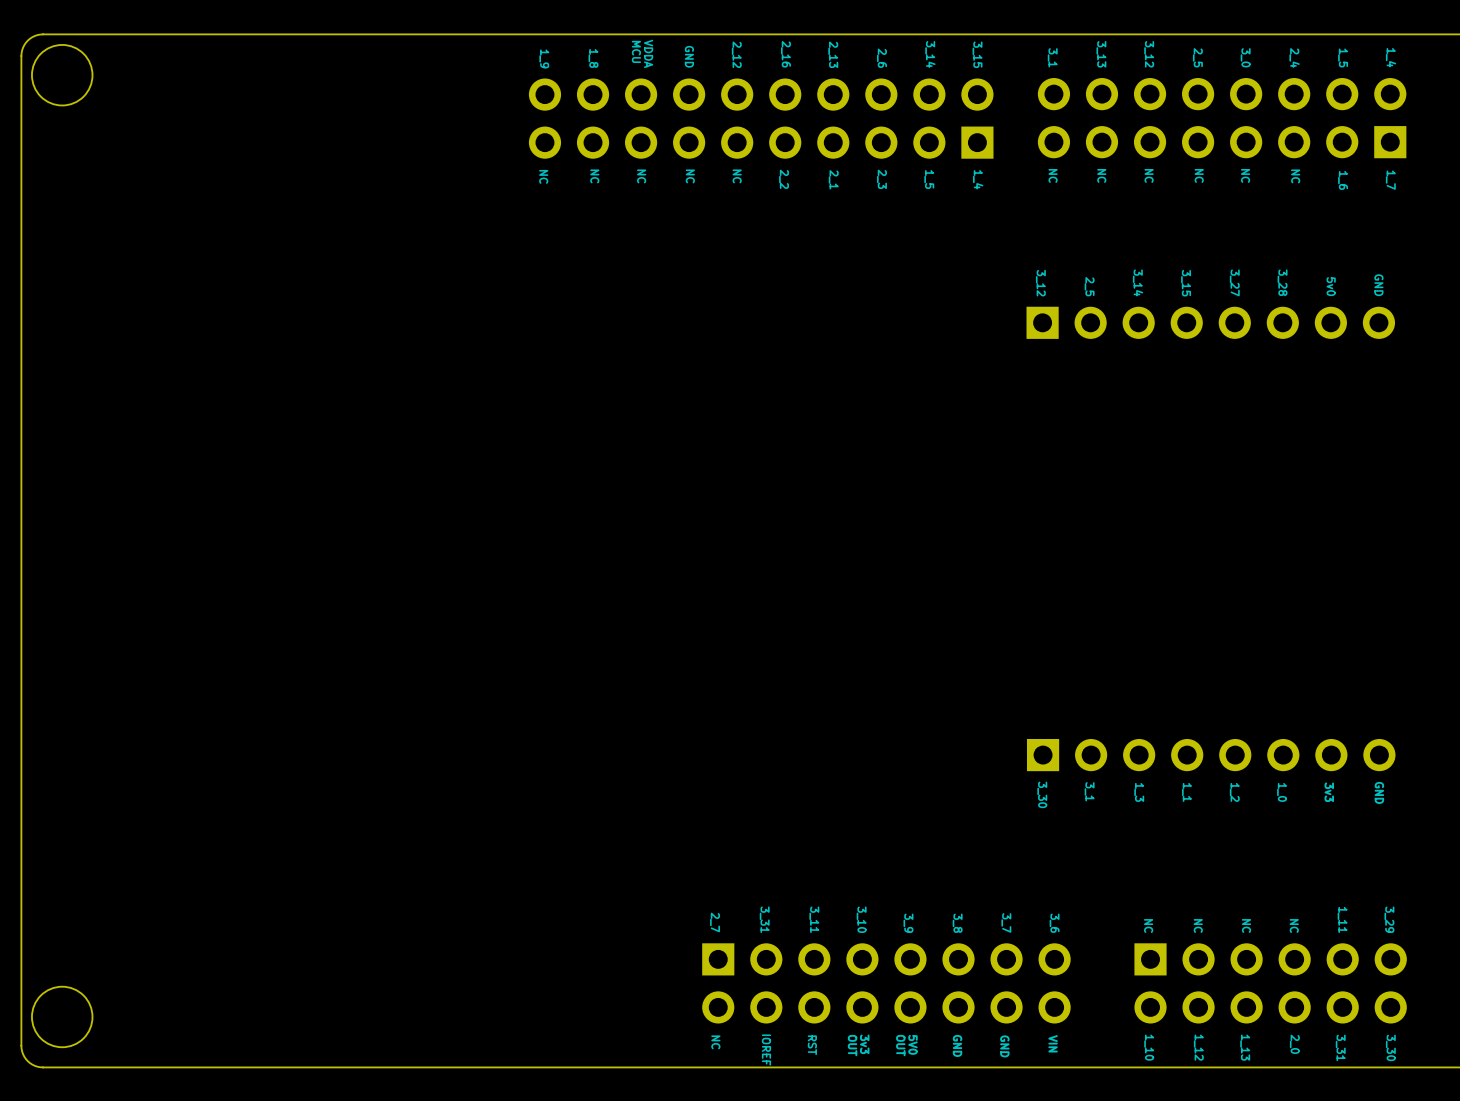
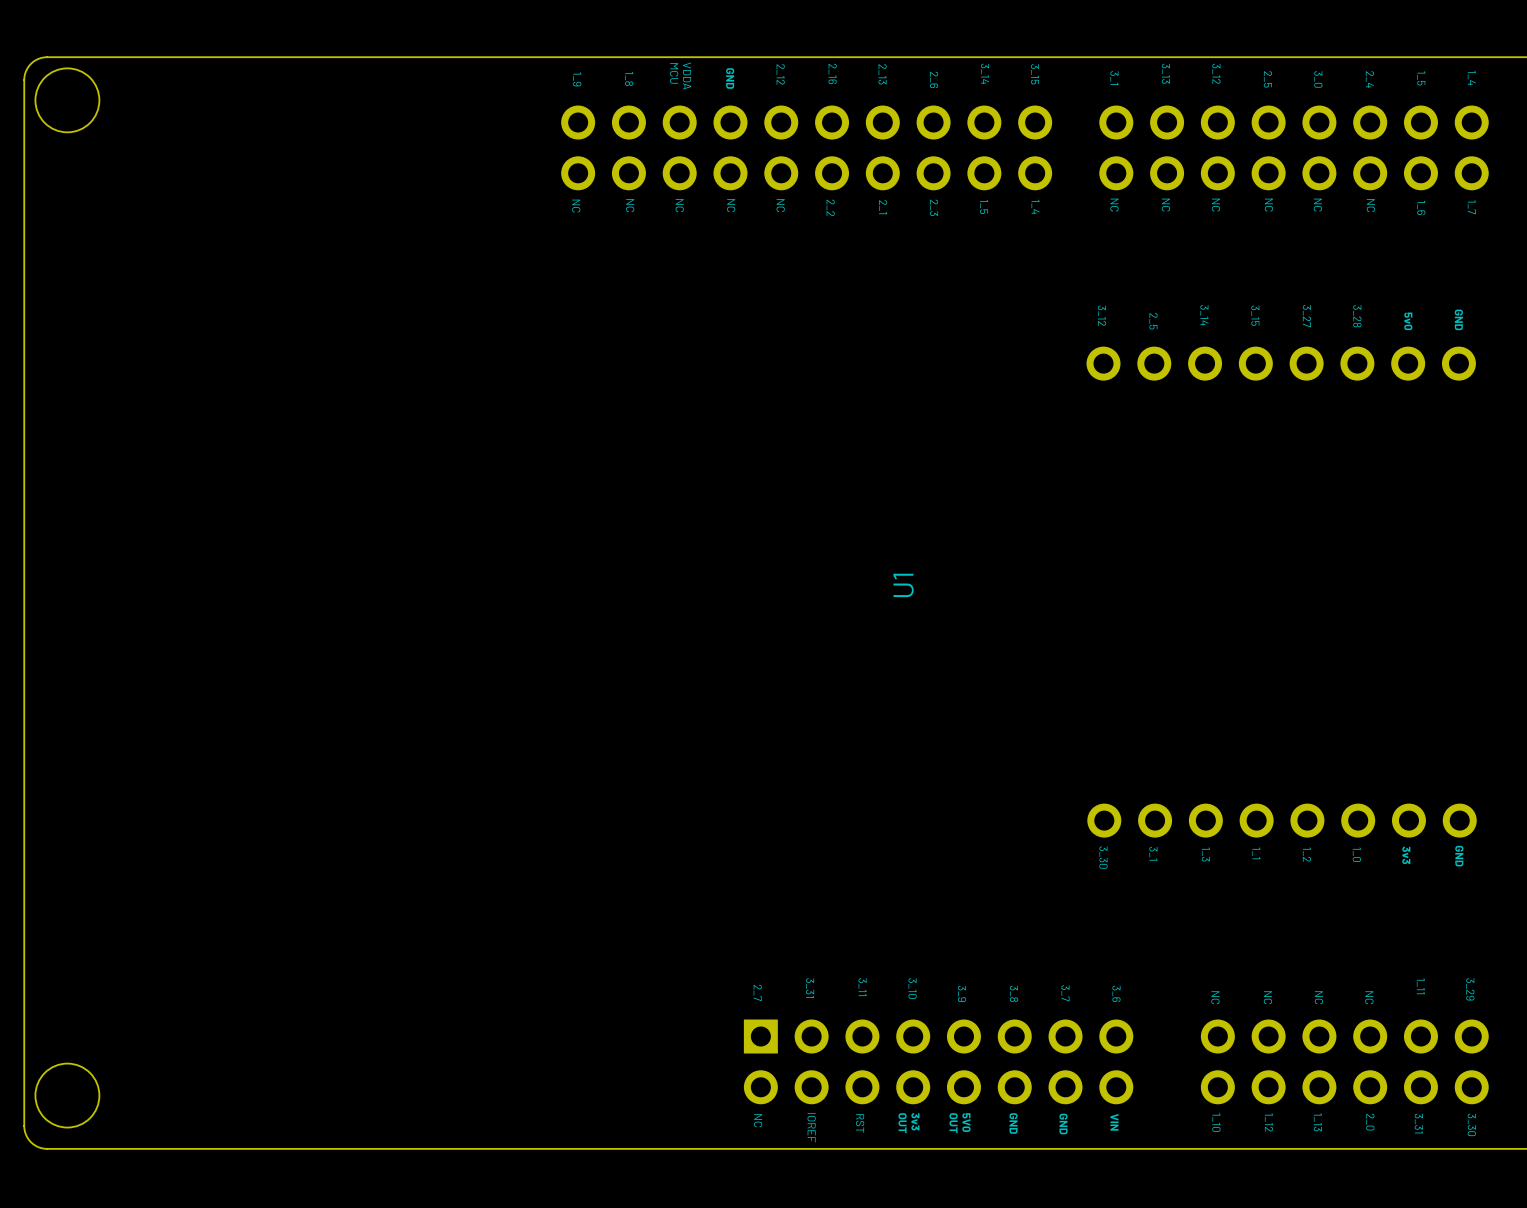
part: (761, 118) -> none
part: (1222, 118) -> none
part: (1210, 322) -> none
U1: none -> (1024, 604)
part: (1211, 755) -> none
part: (886, 983) -> none
part: (1270, 983) -> none

